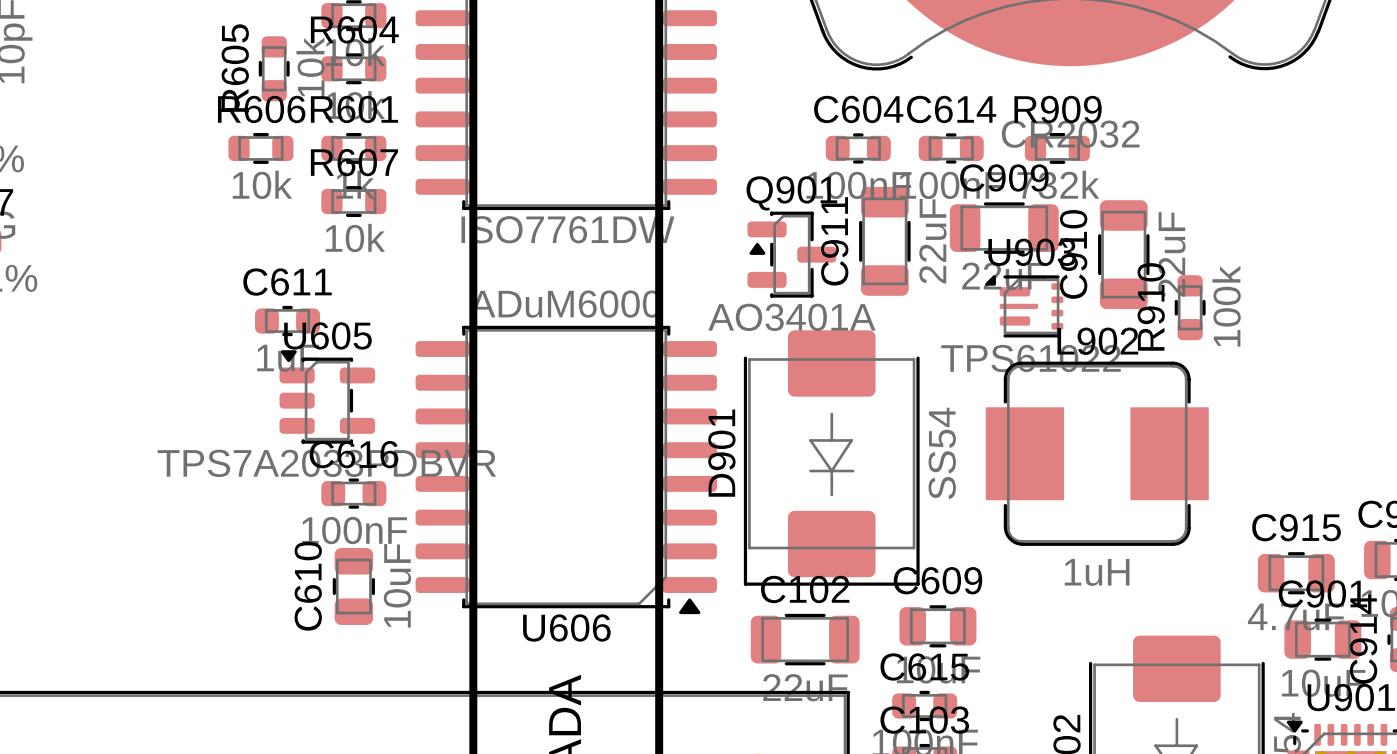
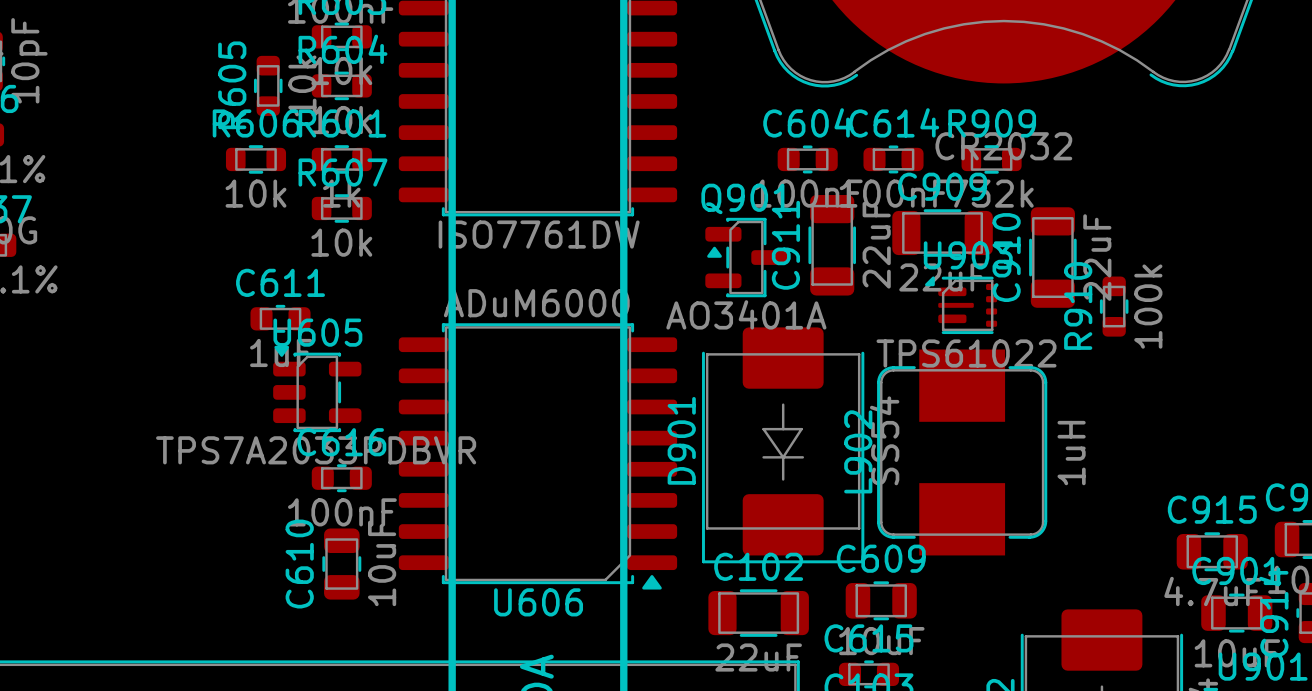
L902 rotation: 0° (1097, 453) -> 90° counterclockwise (962, 452)

